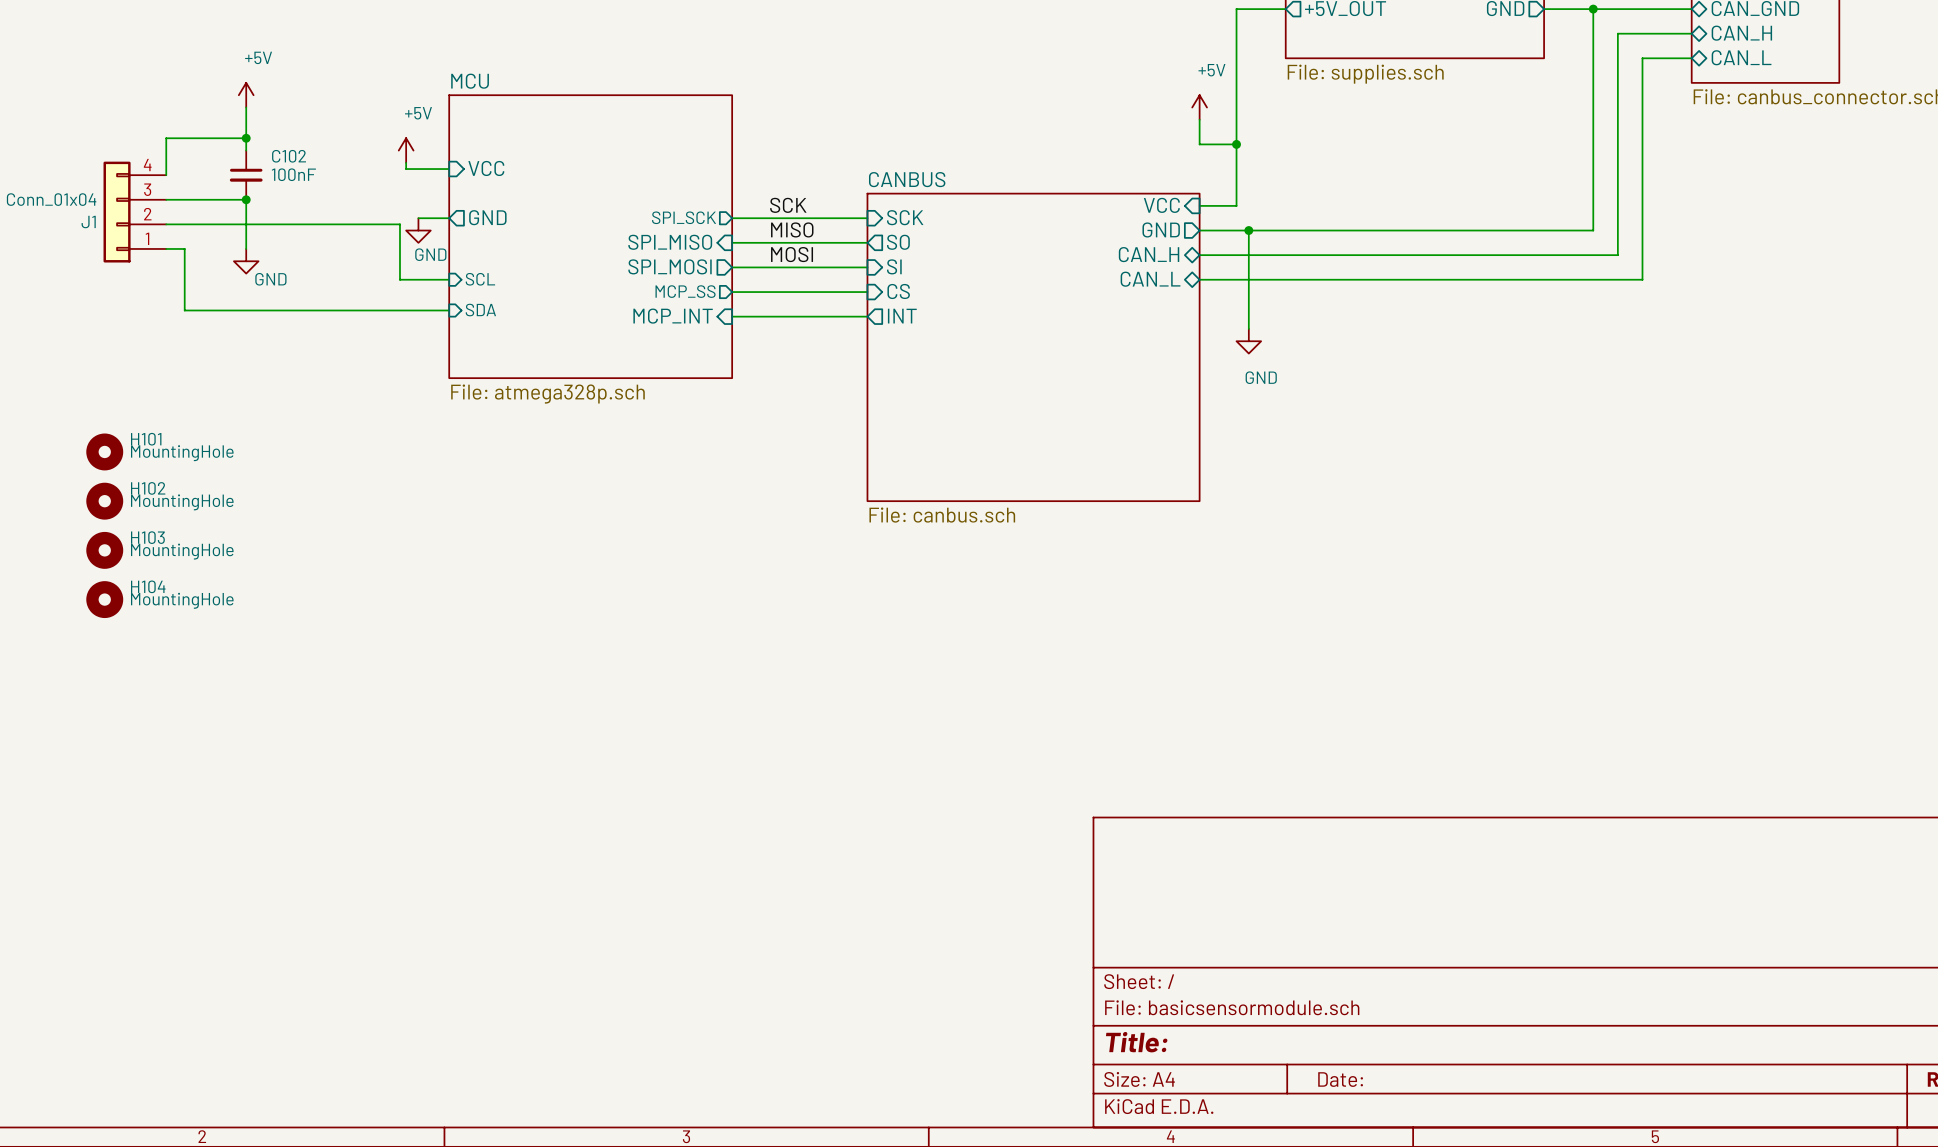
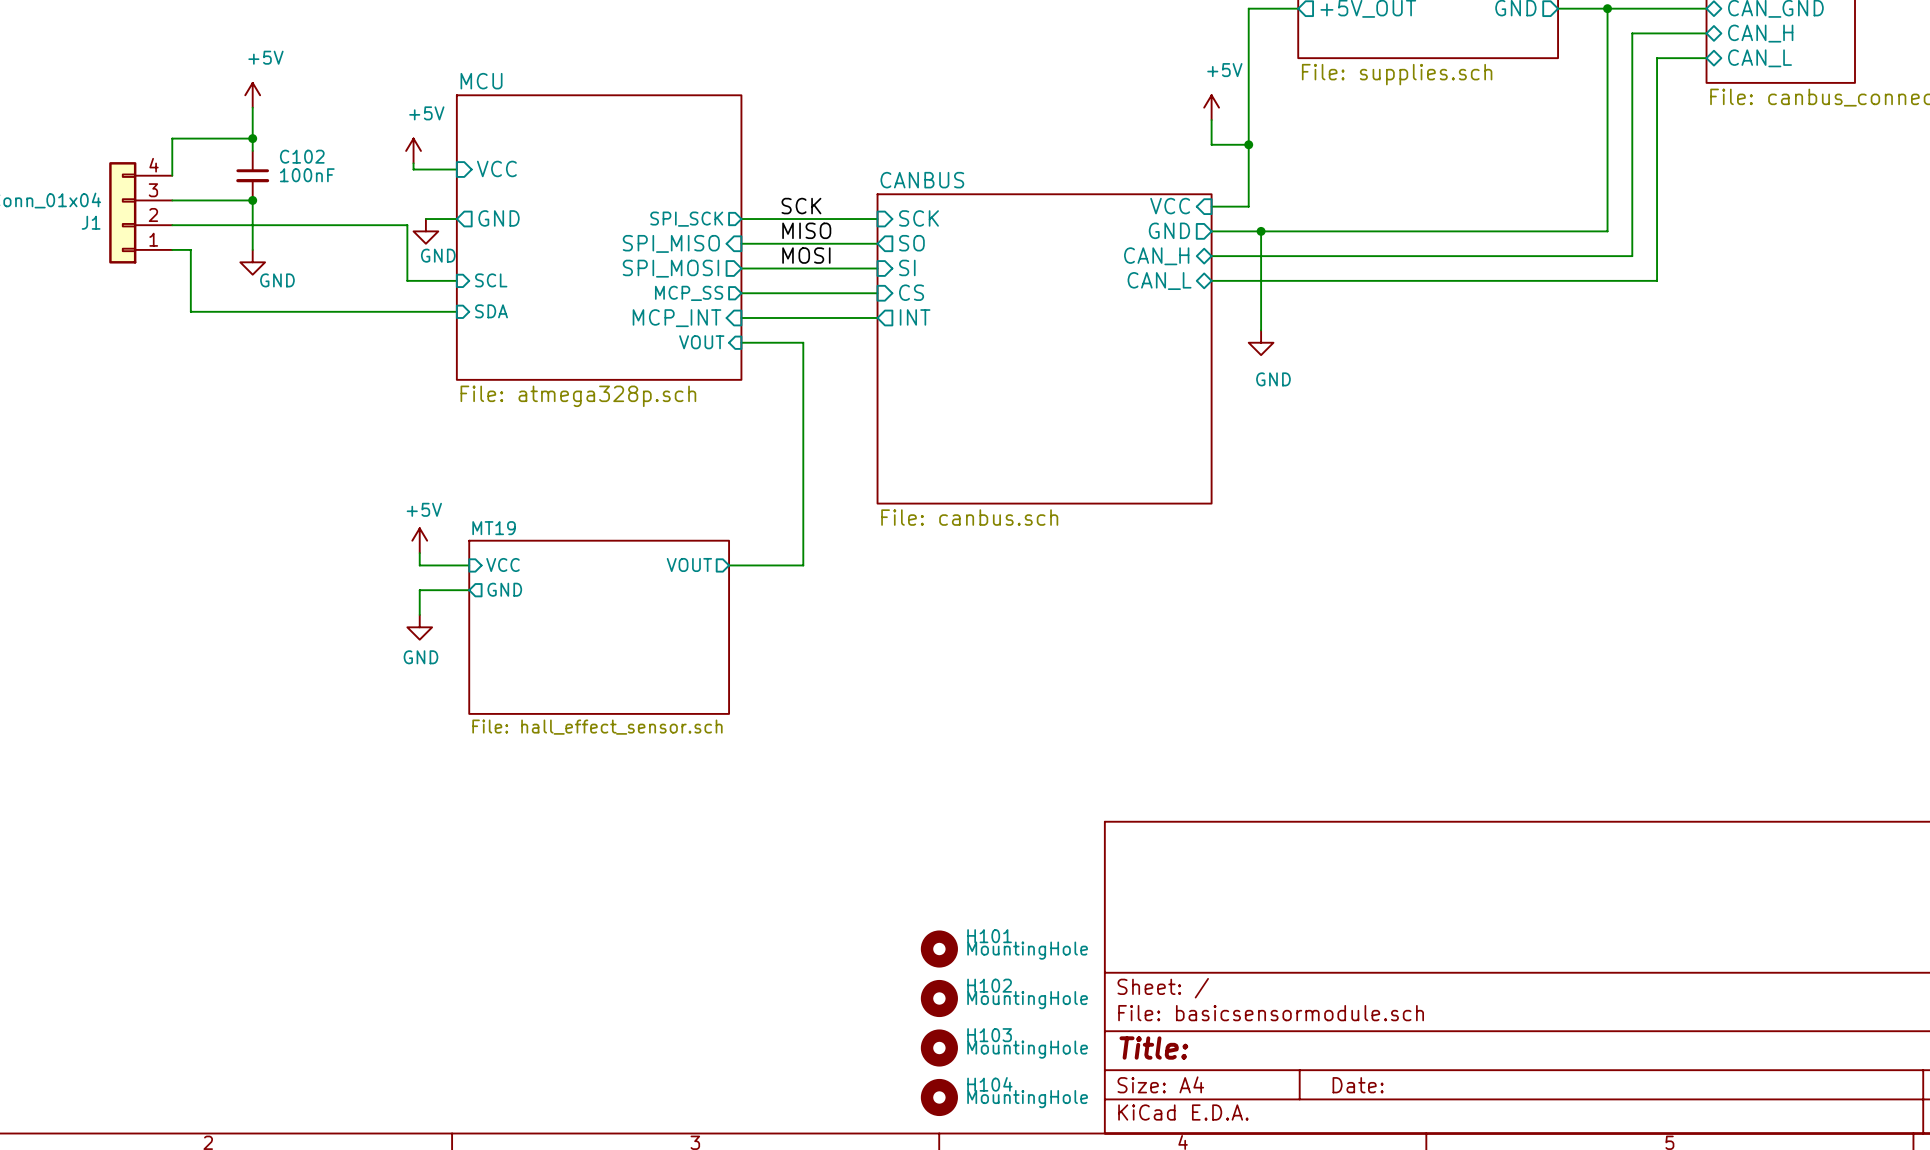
sheet pin: none -> VOUT (701, 342)
wire: none -> (741, 342) (803, 342) (803, 565) (729, 565)
H101 position: (104, 451) -> (939, 949)
H102 position: (104, 501) -> (939, 998)
power symbol: none -> +5V (419, 540)
H103 position: (104, 550) -> (939, 1048)
wire: none -> (419, 553) (419, 565) (469, 565)
sheet pin: none -> VCC (503, 564)
sheet pin: none -> VOUT (689, 564)
sheet pin: none -> GND (504, 589)
wire: none -> (469, 590) (419, 590) (419, 614)
H104 position: (104, 599) -> (939, 1097)
power symbol: none -> GND (419, 627)
sheet MT19: none -> File: hall_effect_sensor.sch (599, 627)

